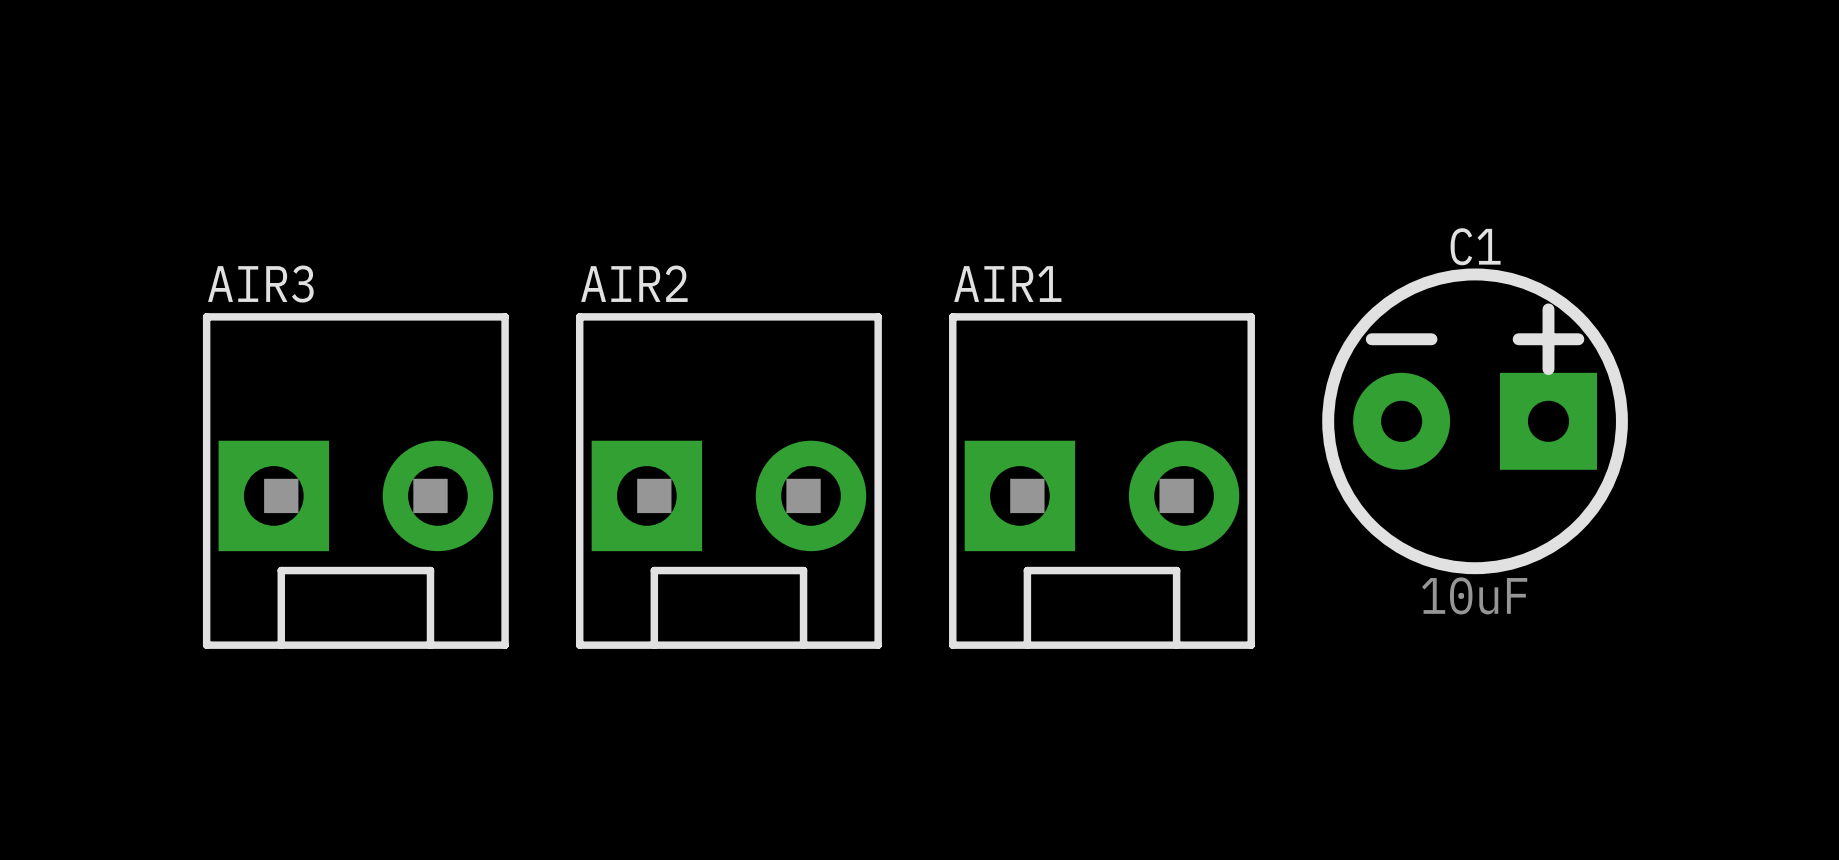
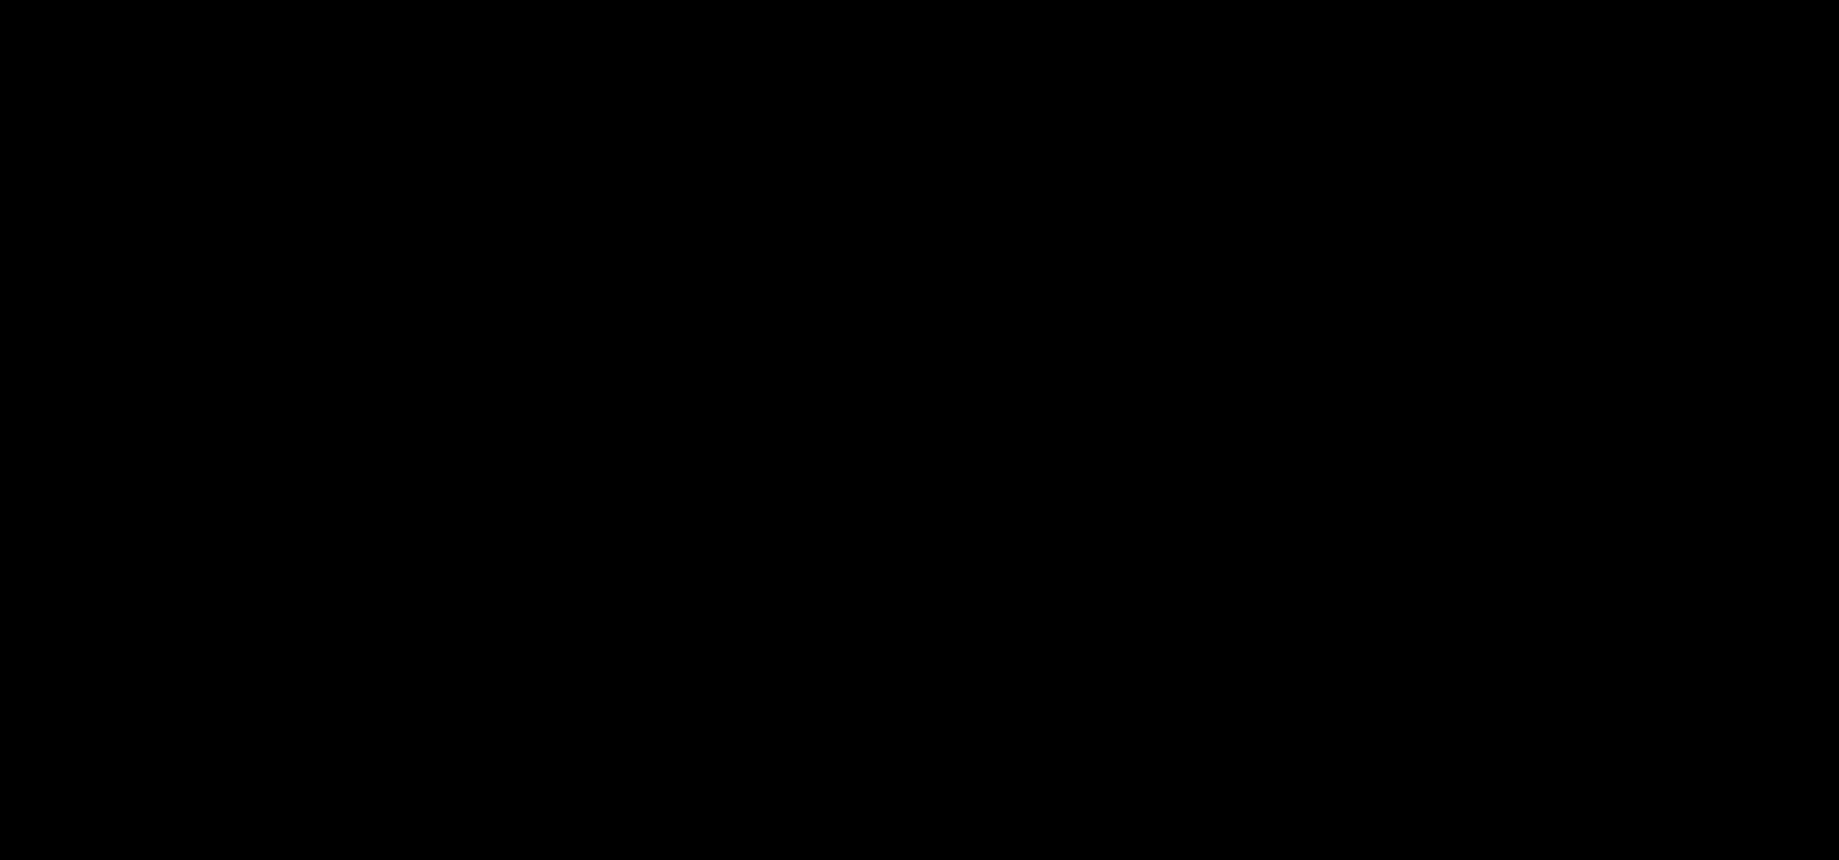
C1: 10uF (1475, 421) -> none
AIR3: (355, 481) -> none
AIR2: (728, 481) -> none
AIR1: (1102, 481) -> none

